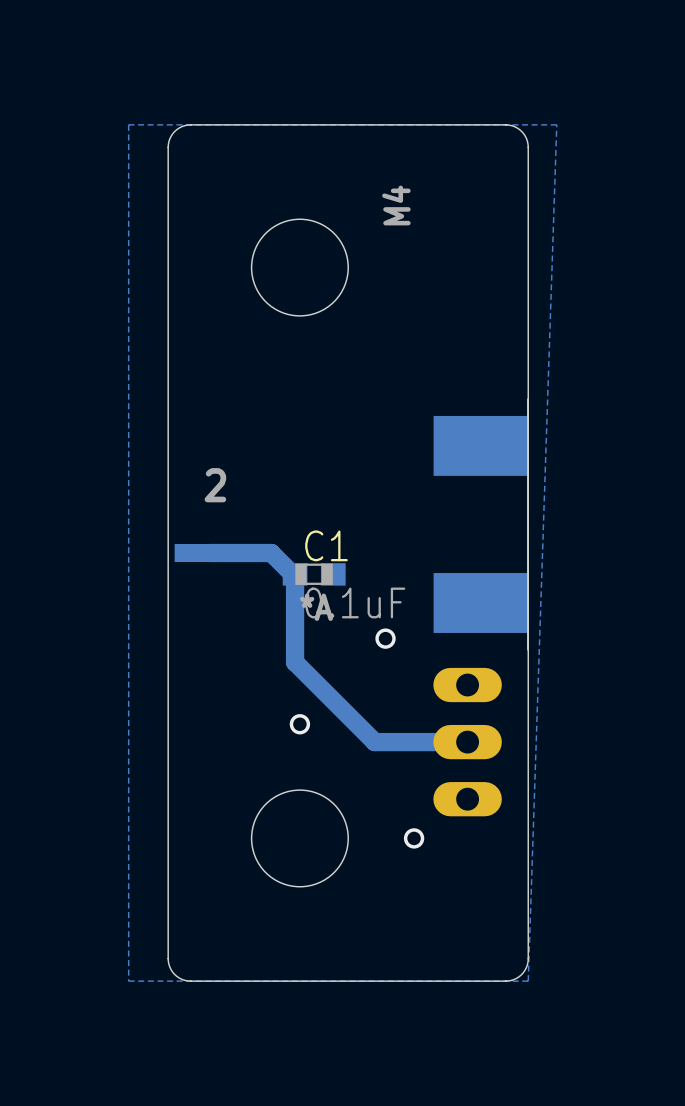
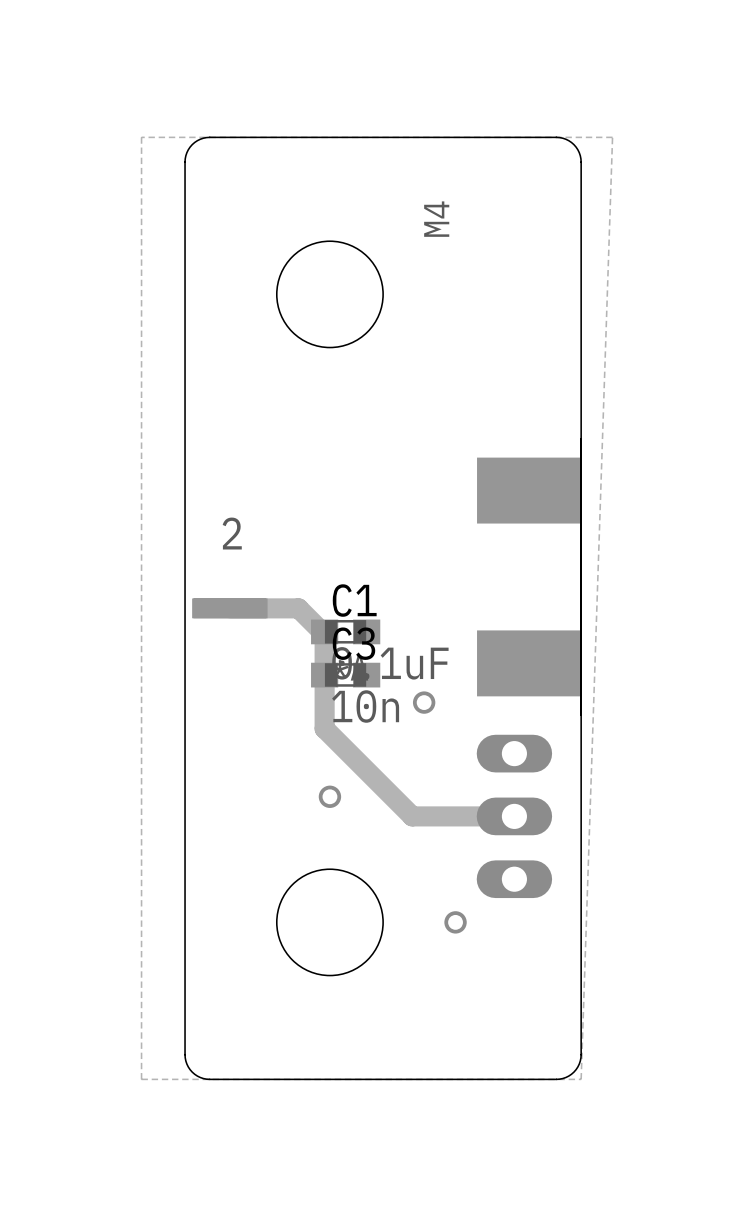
C3: none -> 10n (345, 675)

